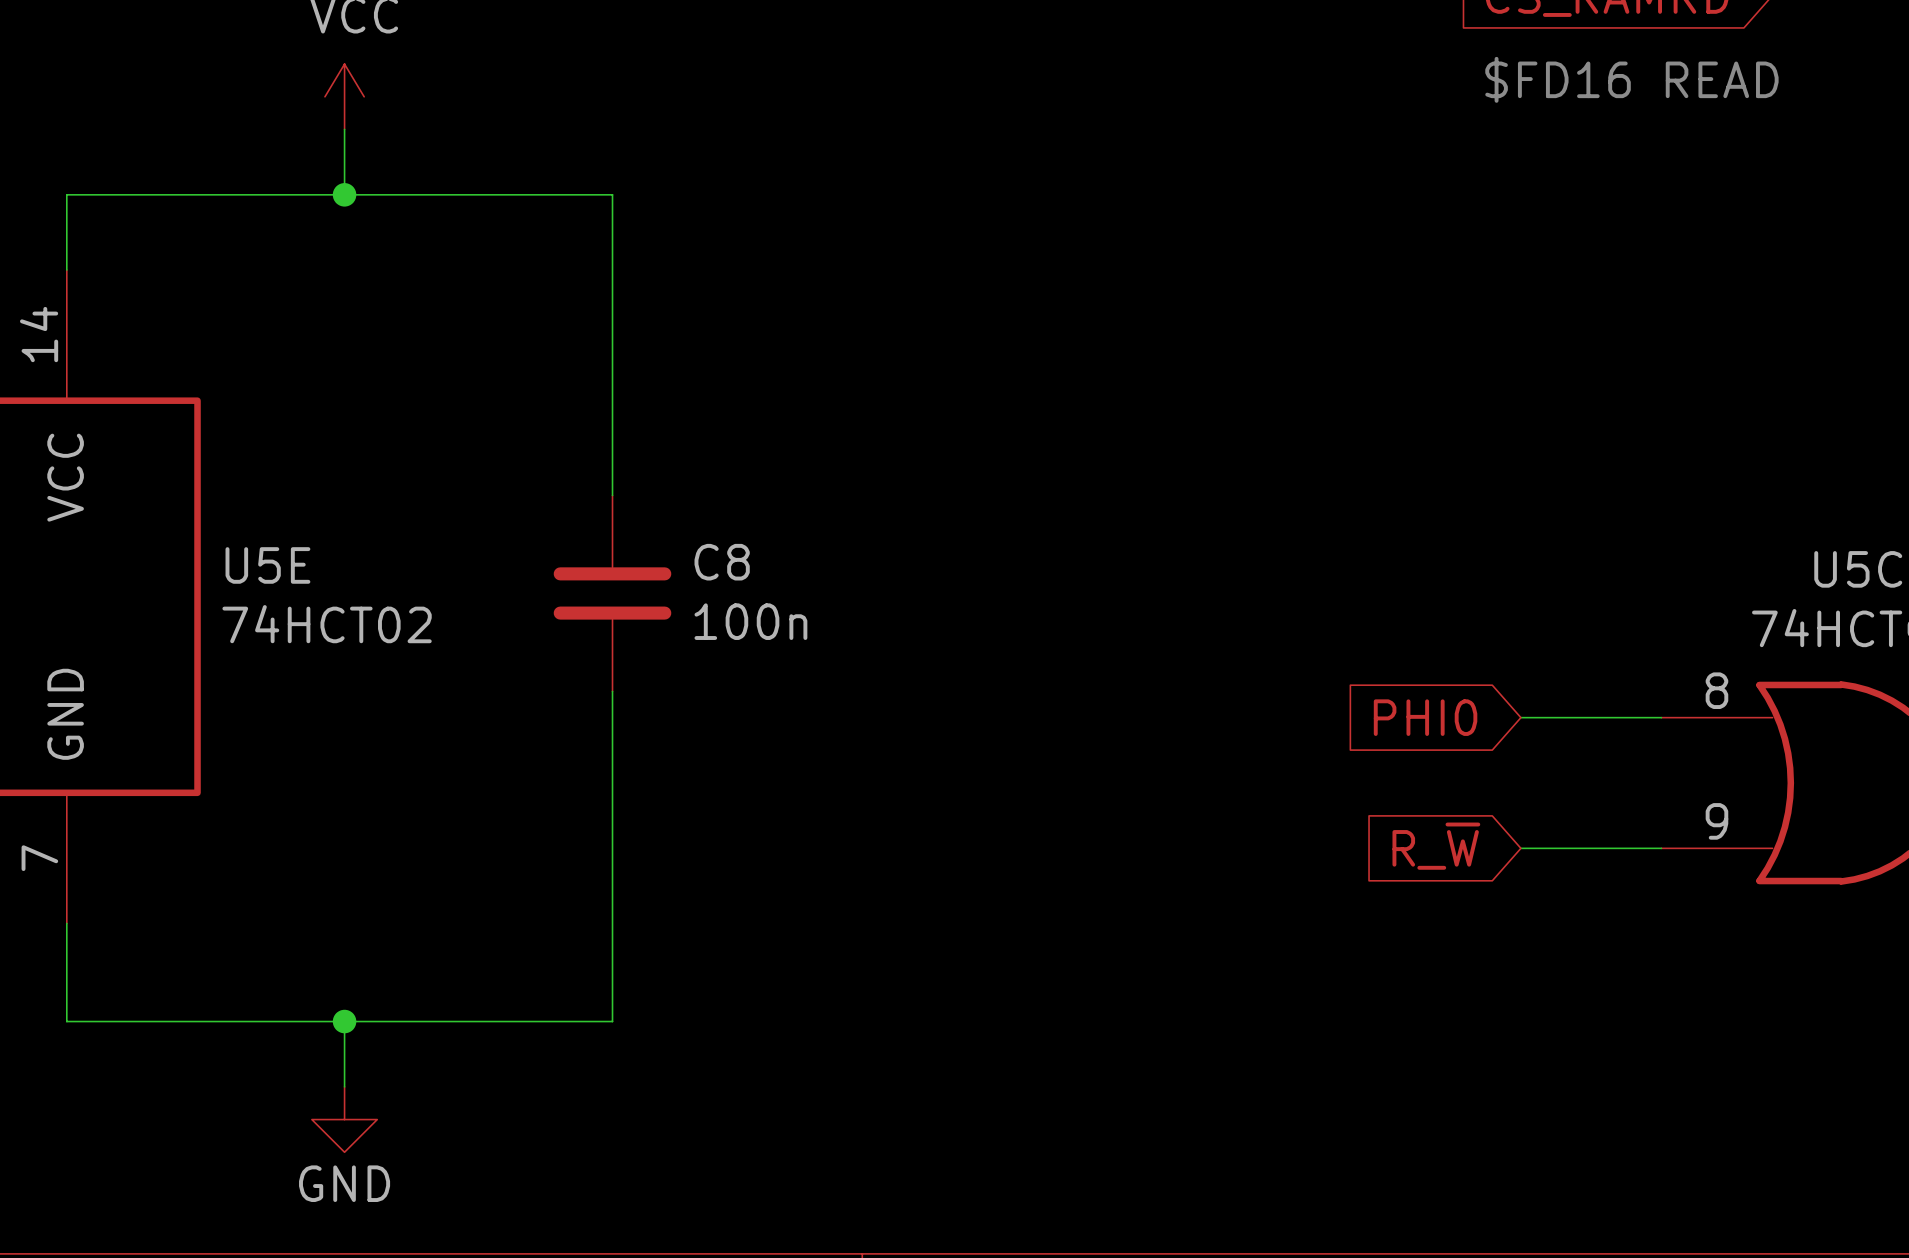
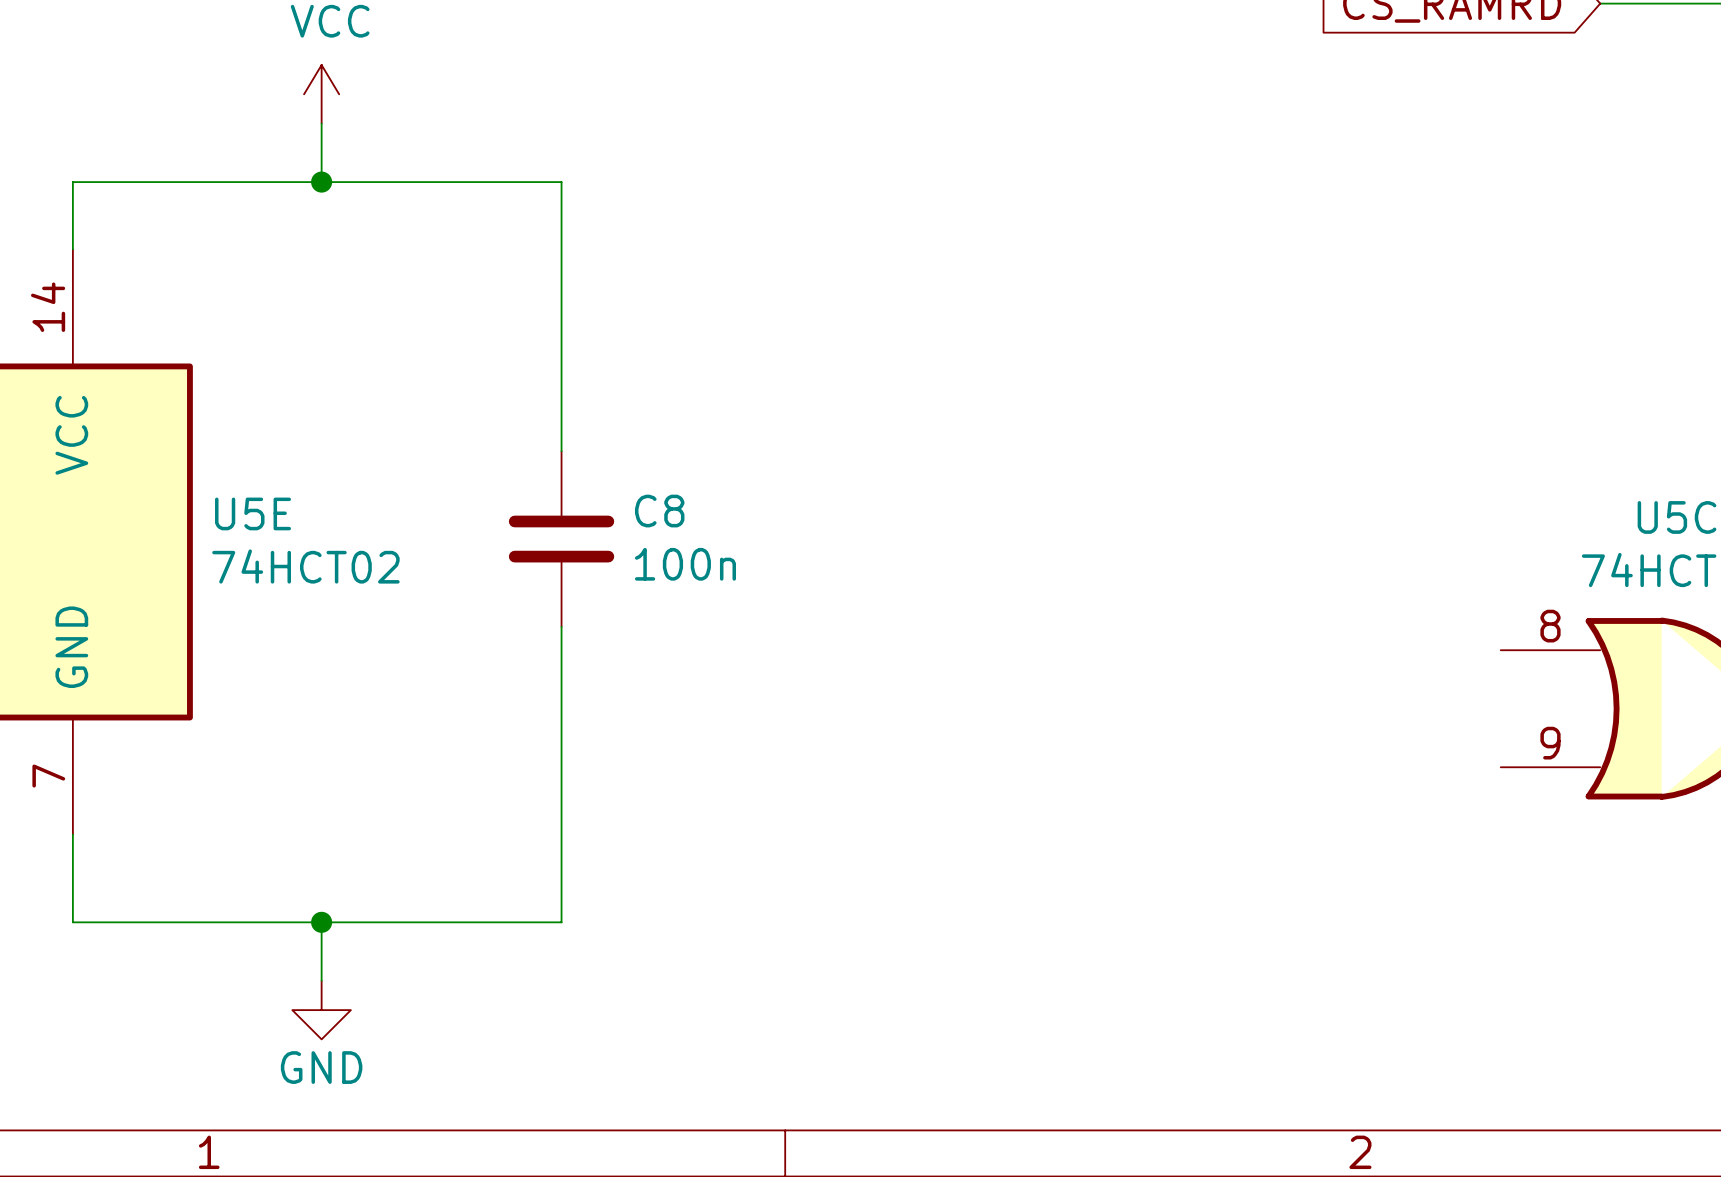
text: $FD16 READ (1631, 79) -> none
global label: PHI0 (1425, 717) -> none
wire: (1520, 717) (1661, 717) -> none
global label: R_~{W} (1436, 846) -> none
wire: (1520, 848) (1661, 848) -> none

